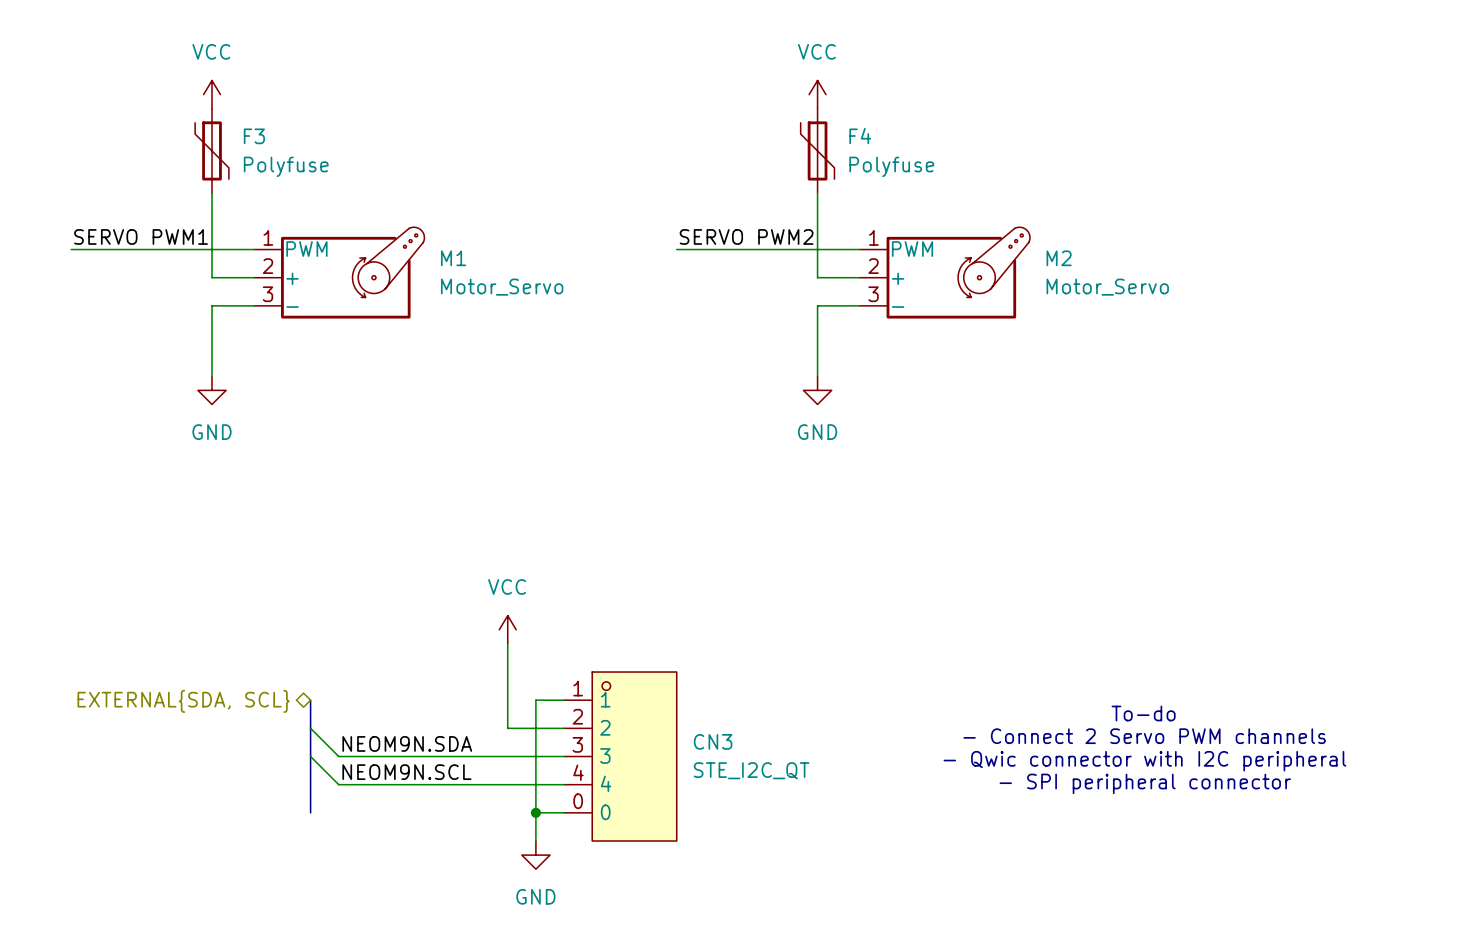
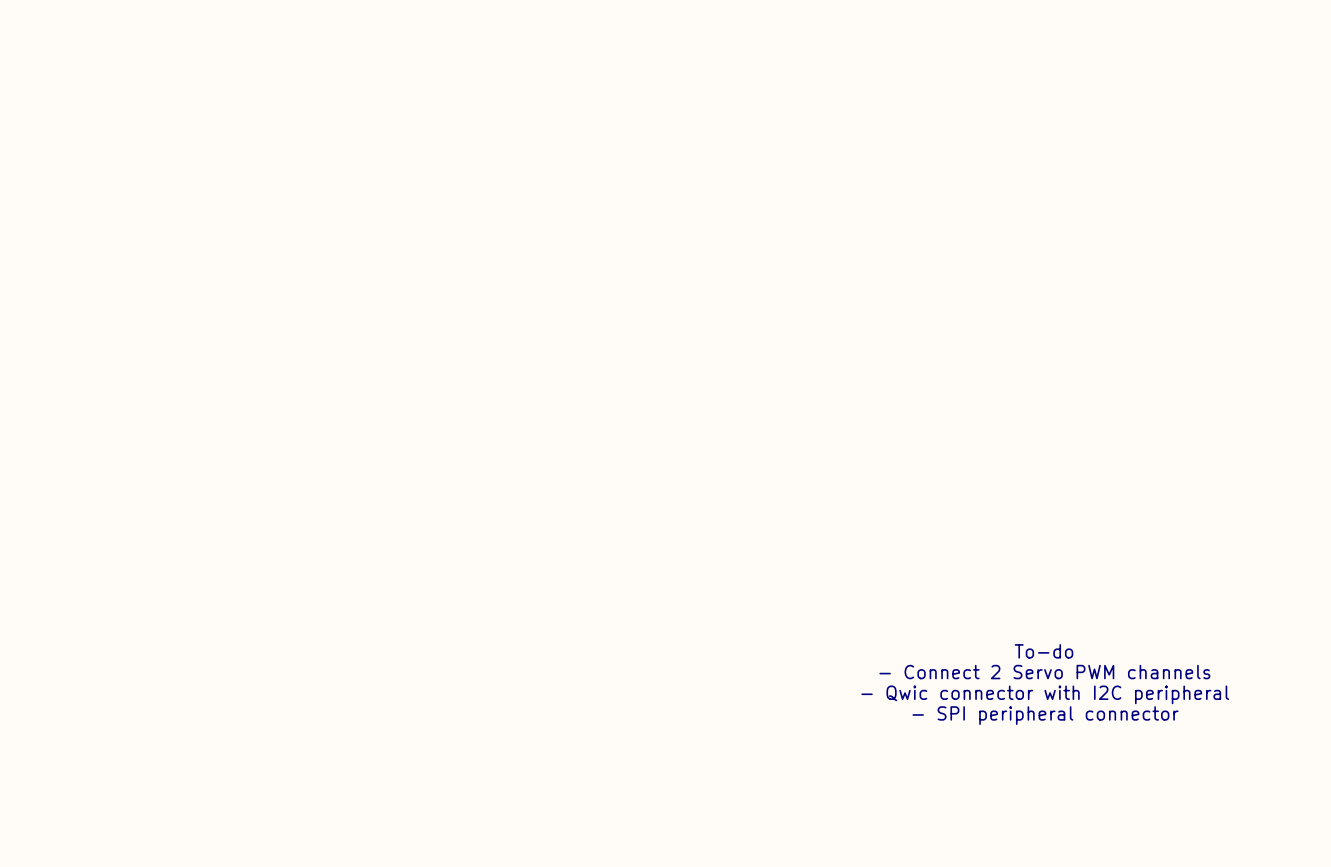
power symbol: VCC (212, 94) -> none
power symbol: VCC (817, 94) -> none
F3: Polyfuse (212, 150) -> none
F4: Polyfuse (817, 150) -> none
wire: (212, 193) (212, 277) (254, 277) -> none
wire: (817, 193) (817, 277) (859, 277) -> none
label: SERVO PWM1 (141, 236) -> none
label: SERVO PWM2 (746, 236) -> none
wire: (71, 249) (254, 249) -> none
wire: (676, 249) (859, 249) -> none
M1: Motor_Servo (339, 272) -> none
M2: Motor_Servo (944, 272) -> none
wire: (254, 305) (212, 305) (212, 376) -> none
wire: (859, 305) (817, 305) (817, 376) -> none
power symbol: GND (212, 390) -> none
power symbol: GND (817, 390) -> none
power symbol: VCC (507, 629) -> none
wire: (507, 643) (507, 728) (564, 728) -> none
bus: (310, 700) (310, 812) -> none
wire: (564, 700) (535, 700) (535, 841) -> none
hierarchical label: EXTERNAL{SDA, SCL} (183, 701) -> none
wire: (310, 728) (338, 756) (564, 756) -> none
label: NEOM9N.SDA (407, 743) -> none
wire: (310, 756) (338, 784) (564, 784) -> none
CN3: STE_I2C_QT (620, 756) -> none
label: NEOM9N.SCL (406, 772) -> none
wire: (535, 812) (564, 812) -> none
junction: (535, 812) -> none
power symbol: GND (535, 855) -> none

